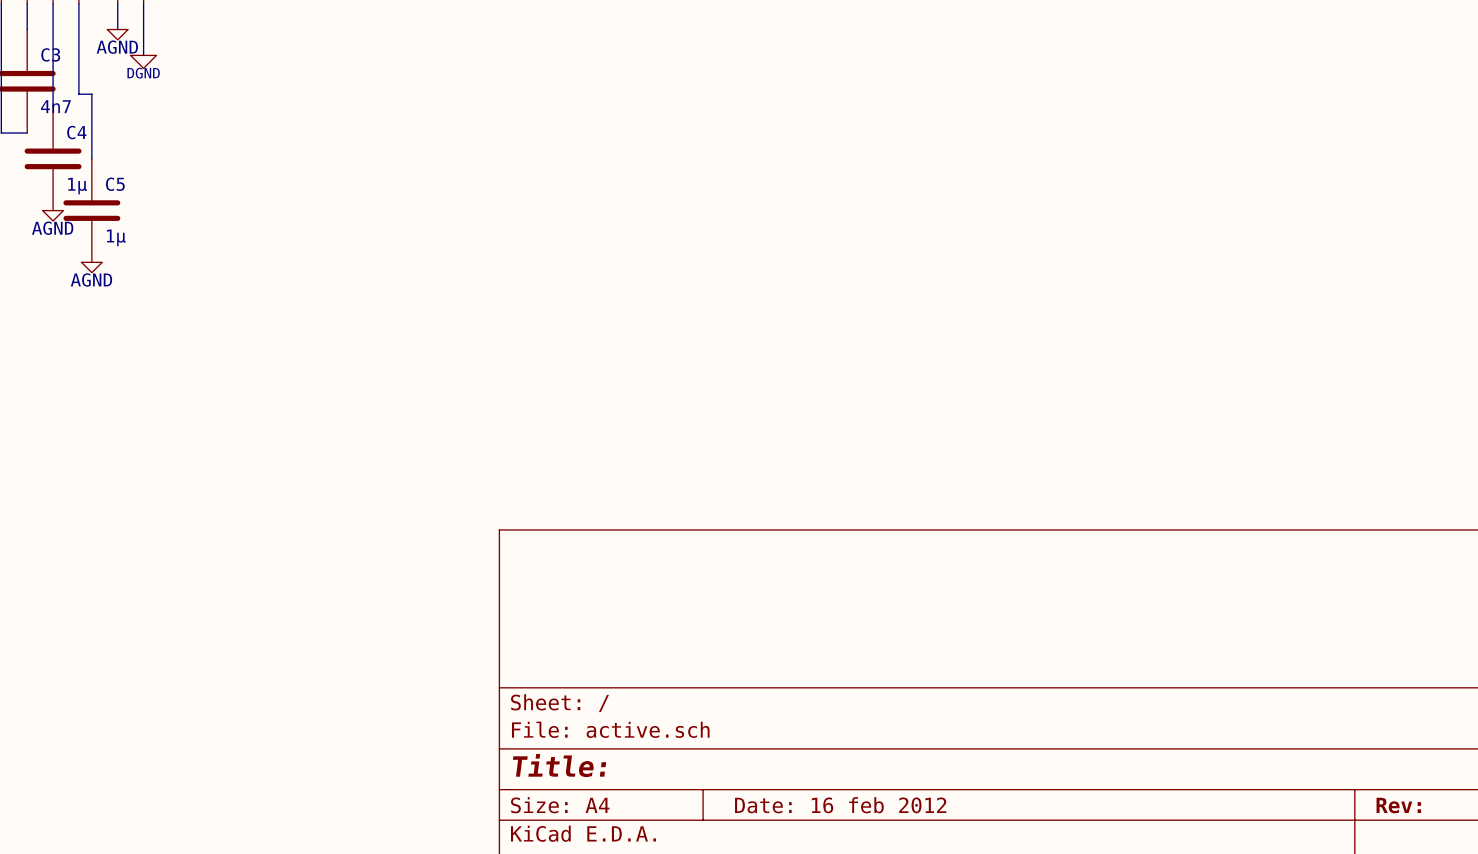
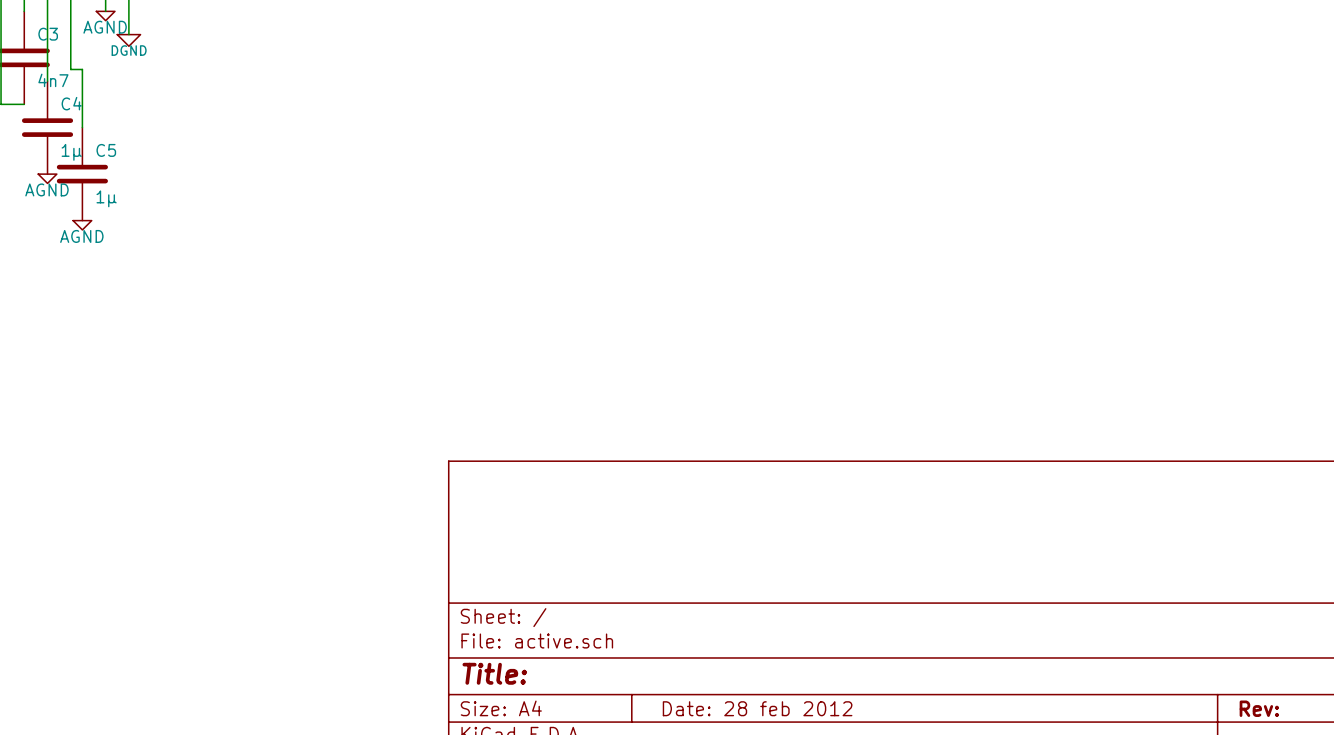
title block: Date: 16 feb 2012 (840, 805) -> Date: 28 feb 2012 (757, 708)

